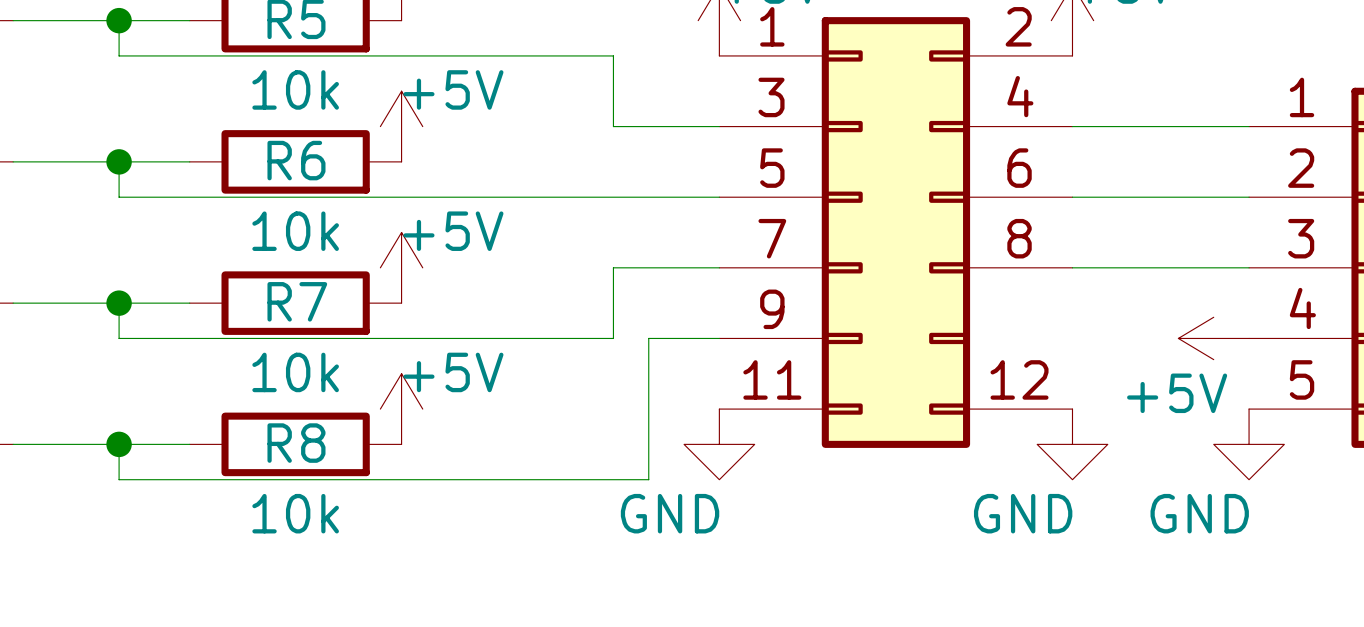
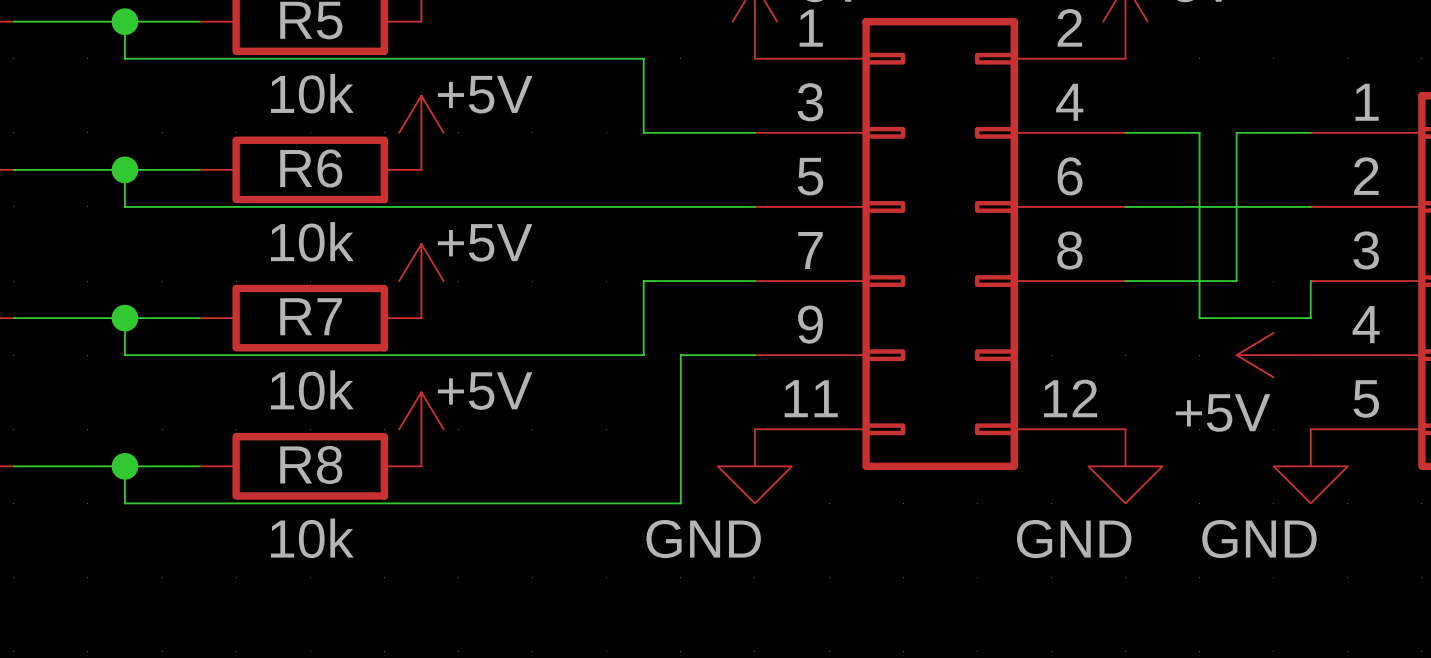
wire: (1143, 126) (1178, 126) -> (1236, 281) (1236, 132)
wire: (1178, 267) (1249, 267) -> (1199, 132) (1199, 318) (1310, 318) (1310, 281)

